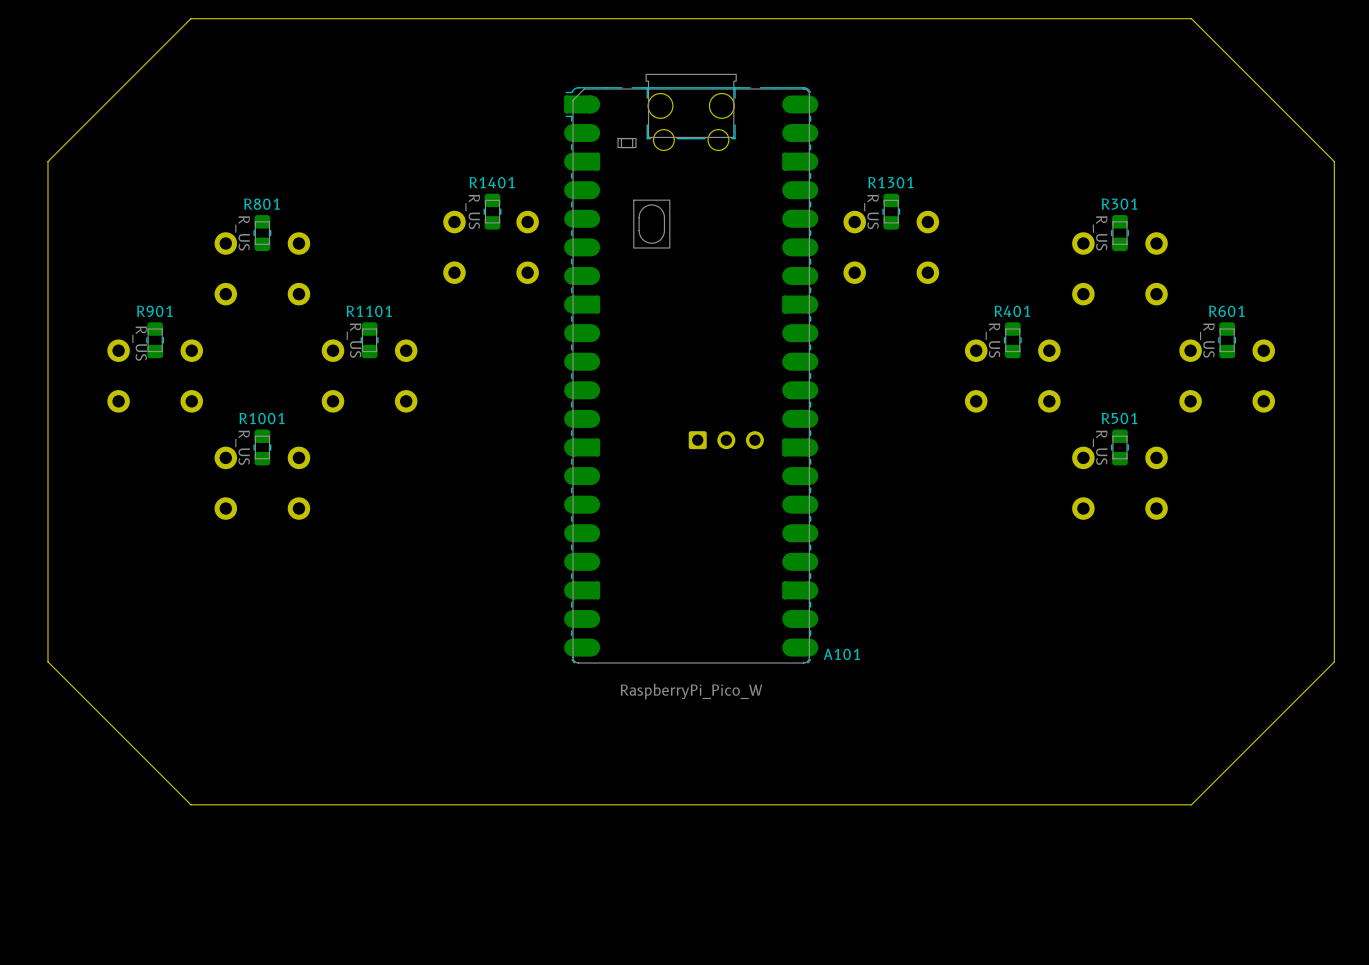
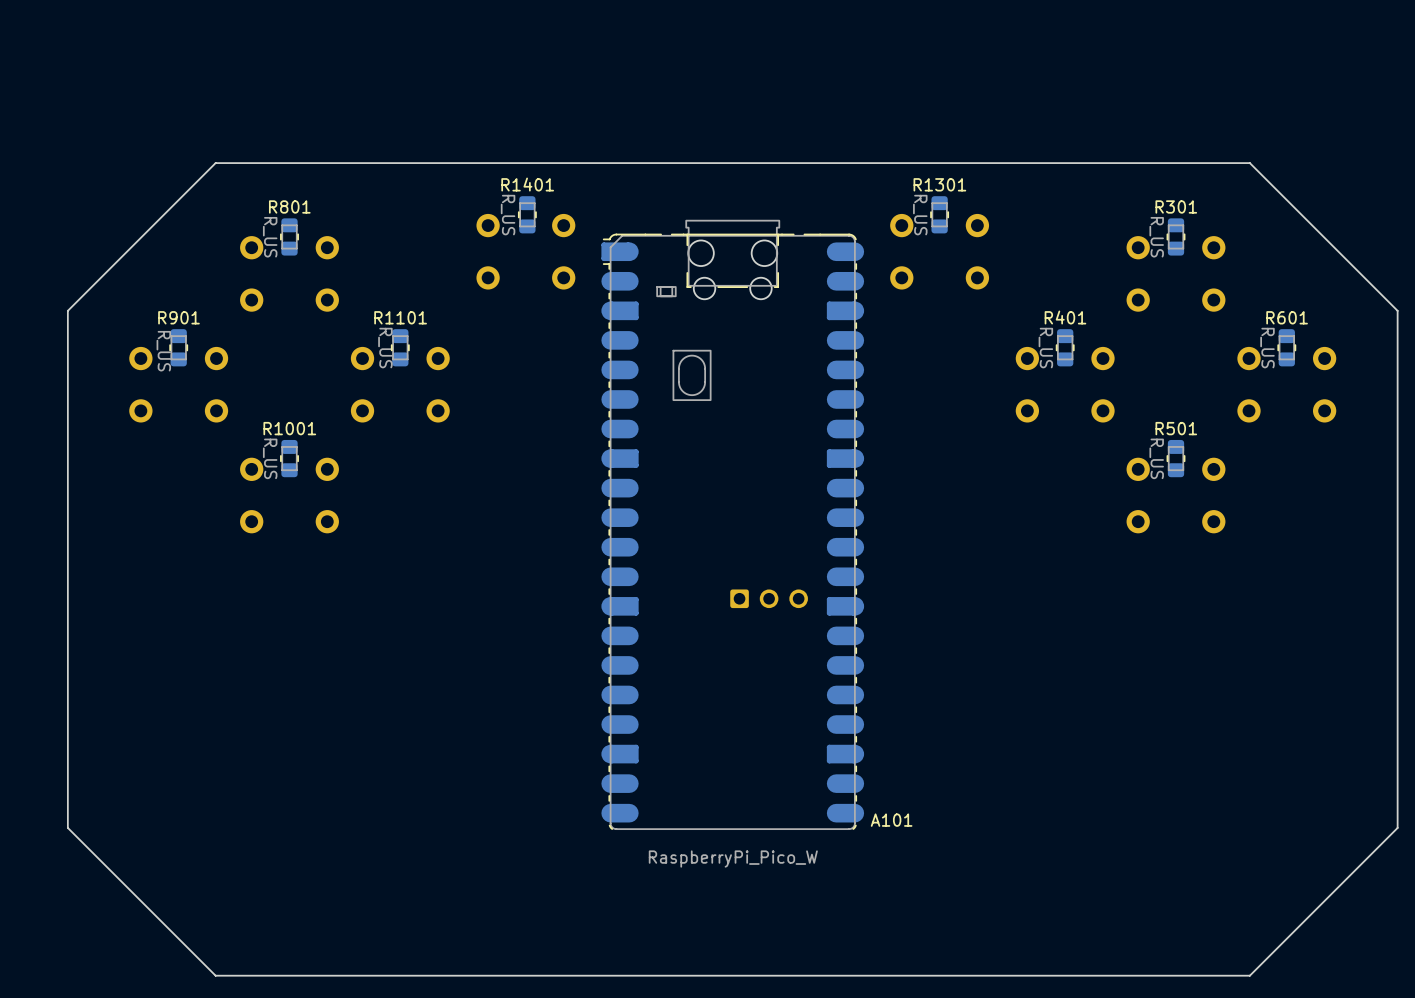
board edge: (1334, 304) (1334, 161) (1191, 18) (190, 18) (47, 161) (47, 304) -> (1397, 310) (1249, 163) (215, 163) (67, 310)
A101 position: (691, 368) -> (732, 524)
board edge: (1334, 661) (1191, 804) (190, 804) (47, 661) -> (1397, 680) (1397, 827) (1249, 975) (215, 975) (67, 827) (67, 680)

